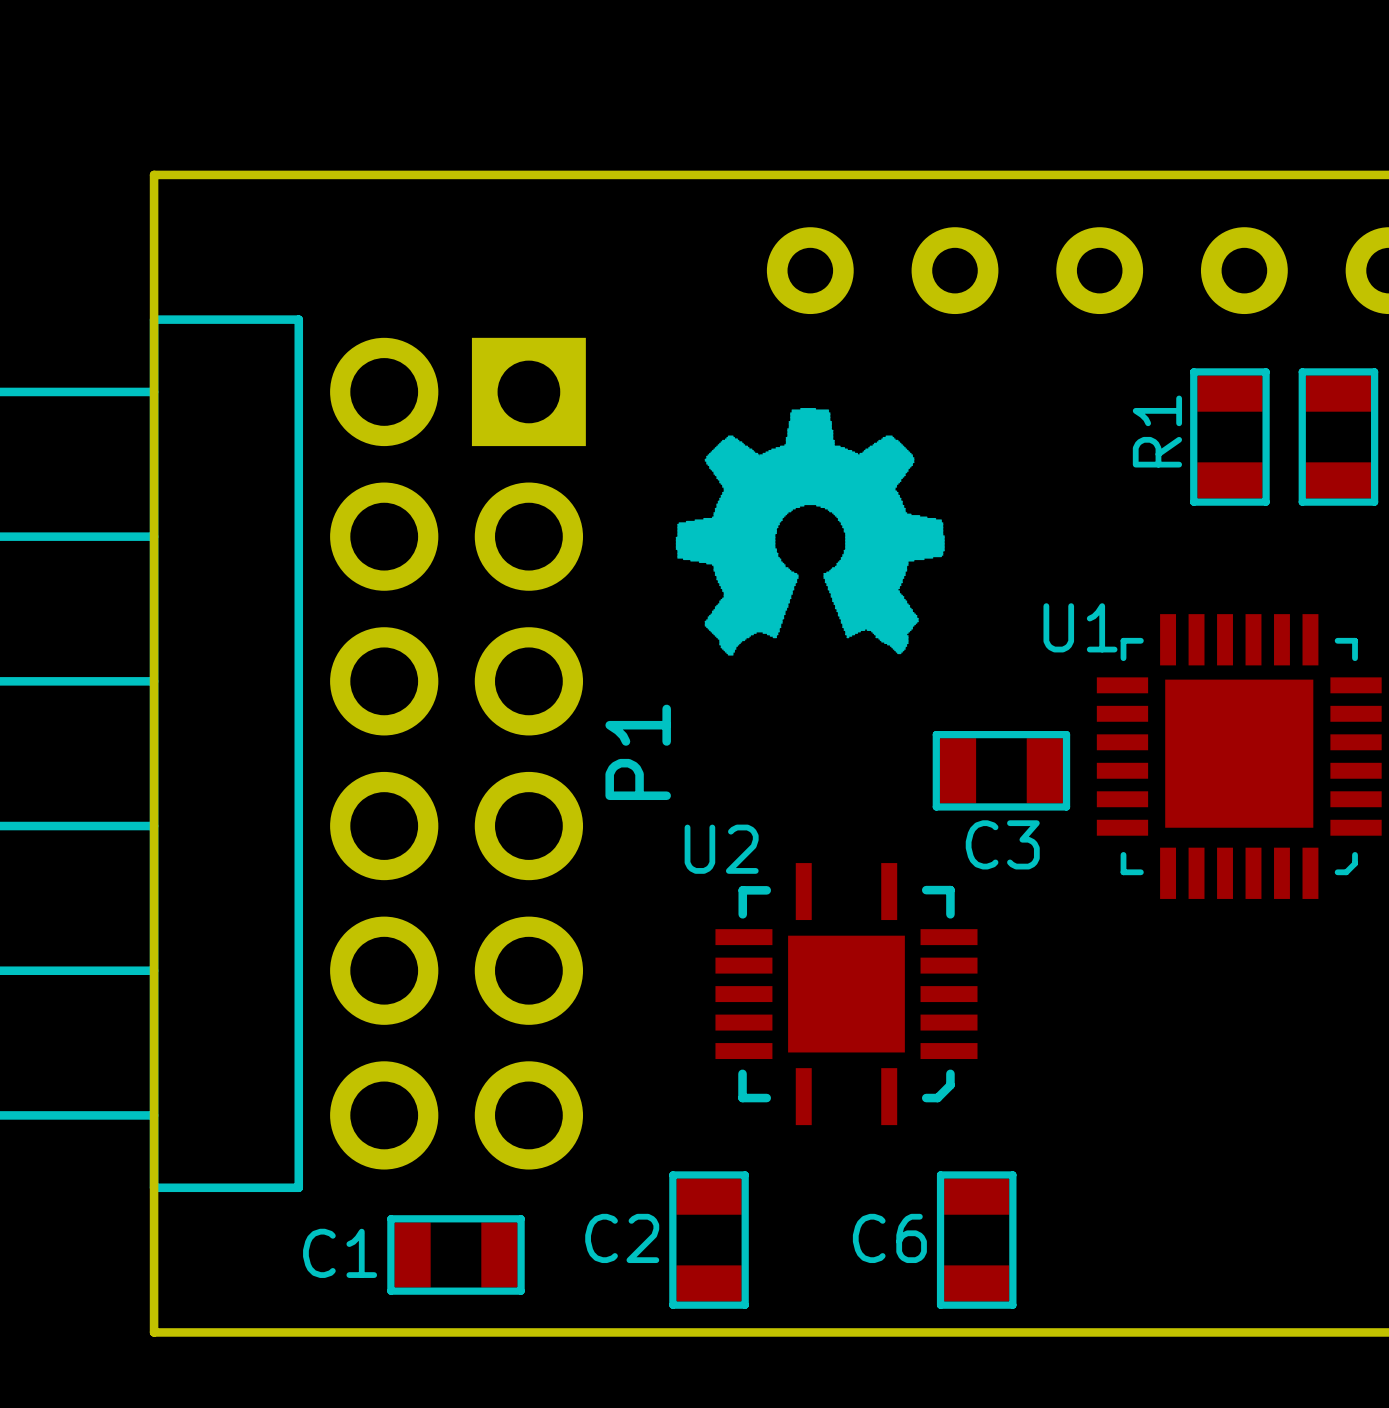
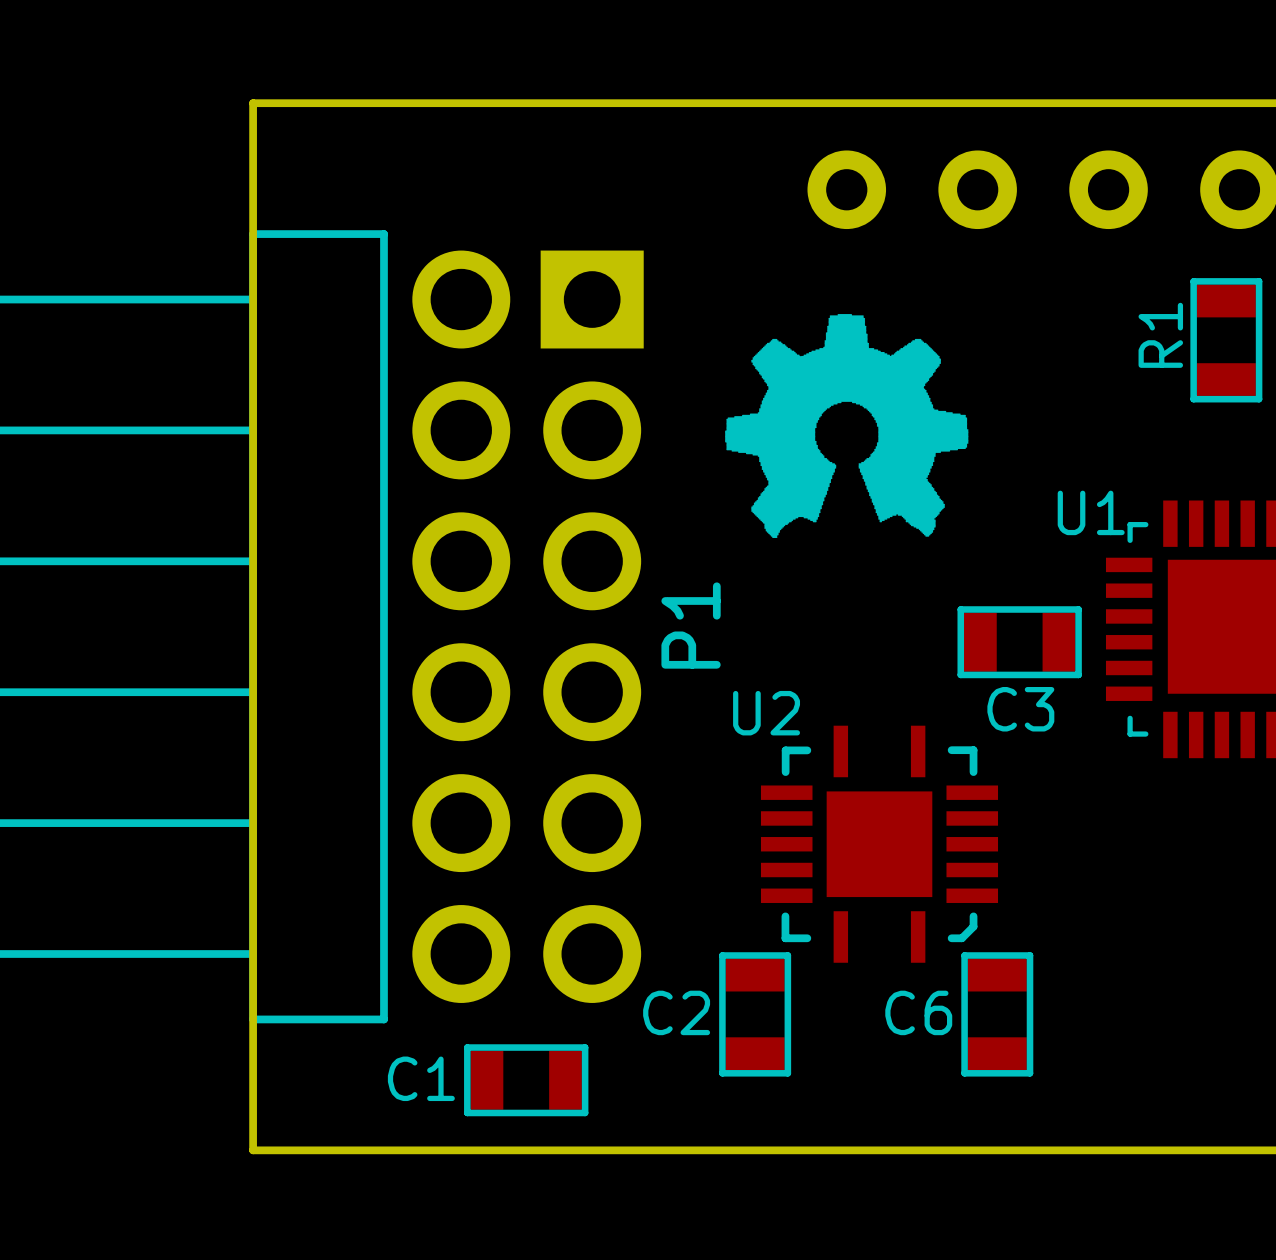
C2 position: (709, 1240) -> (755, 1014)
C6 position: (976, 1240) -> (997, 1014)

